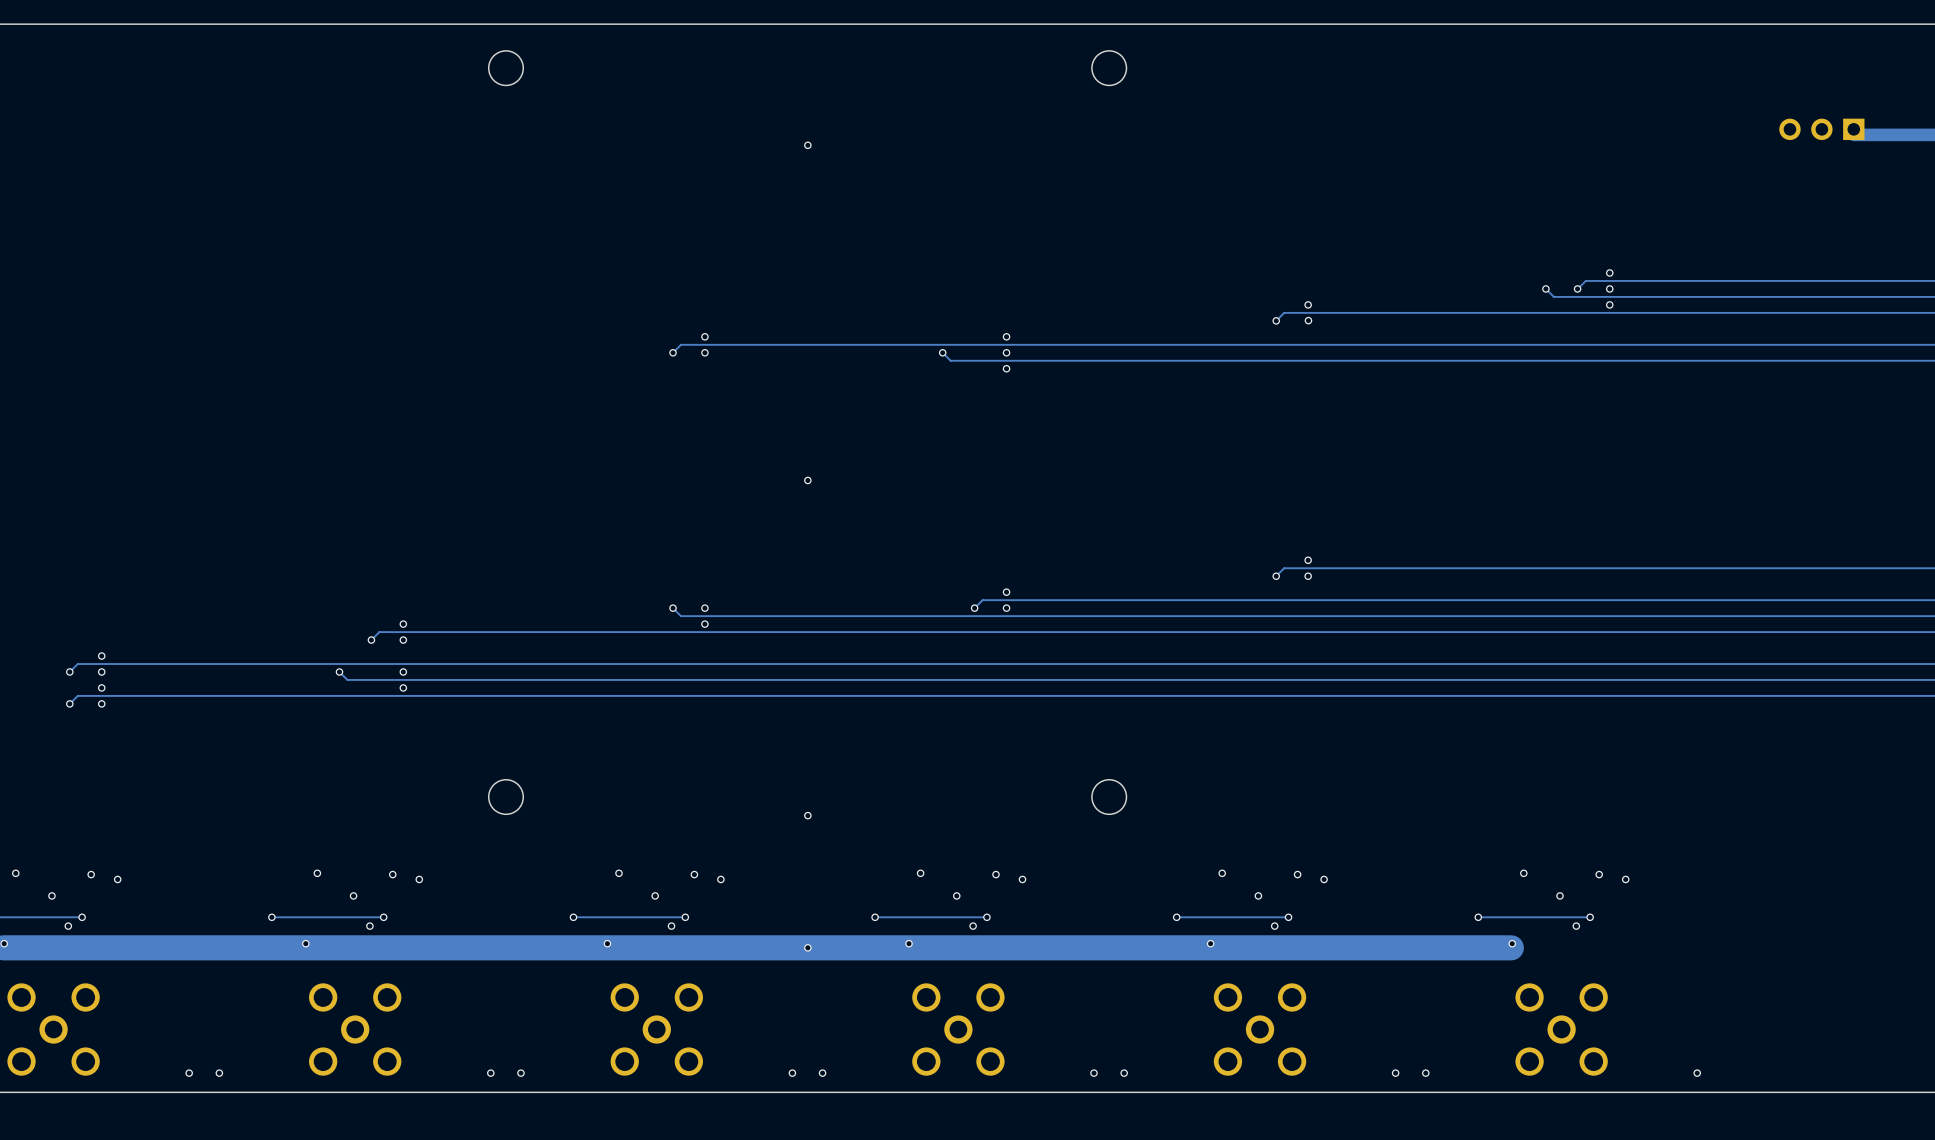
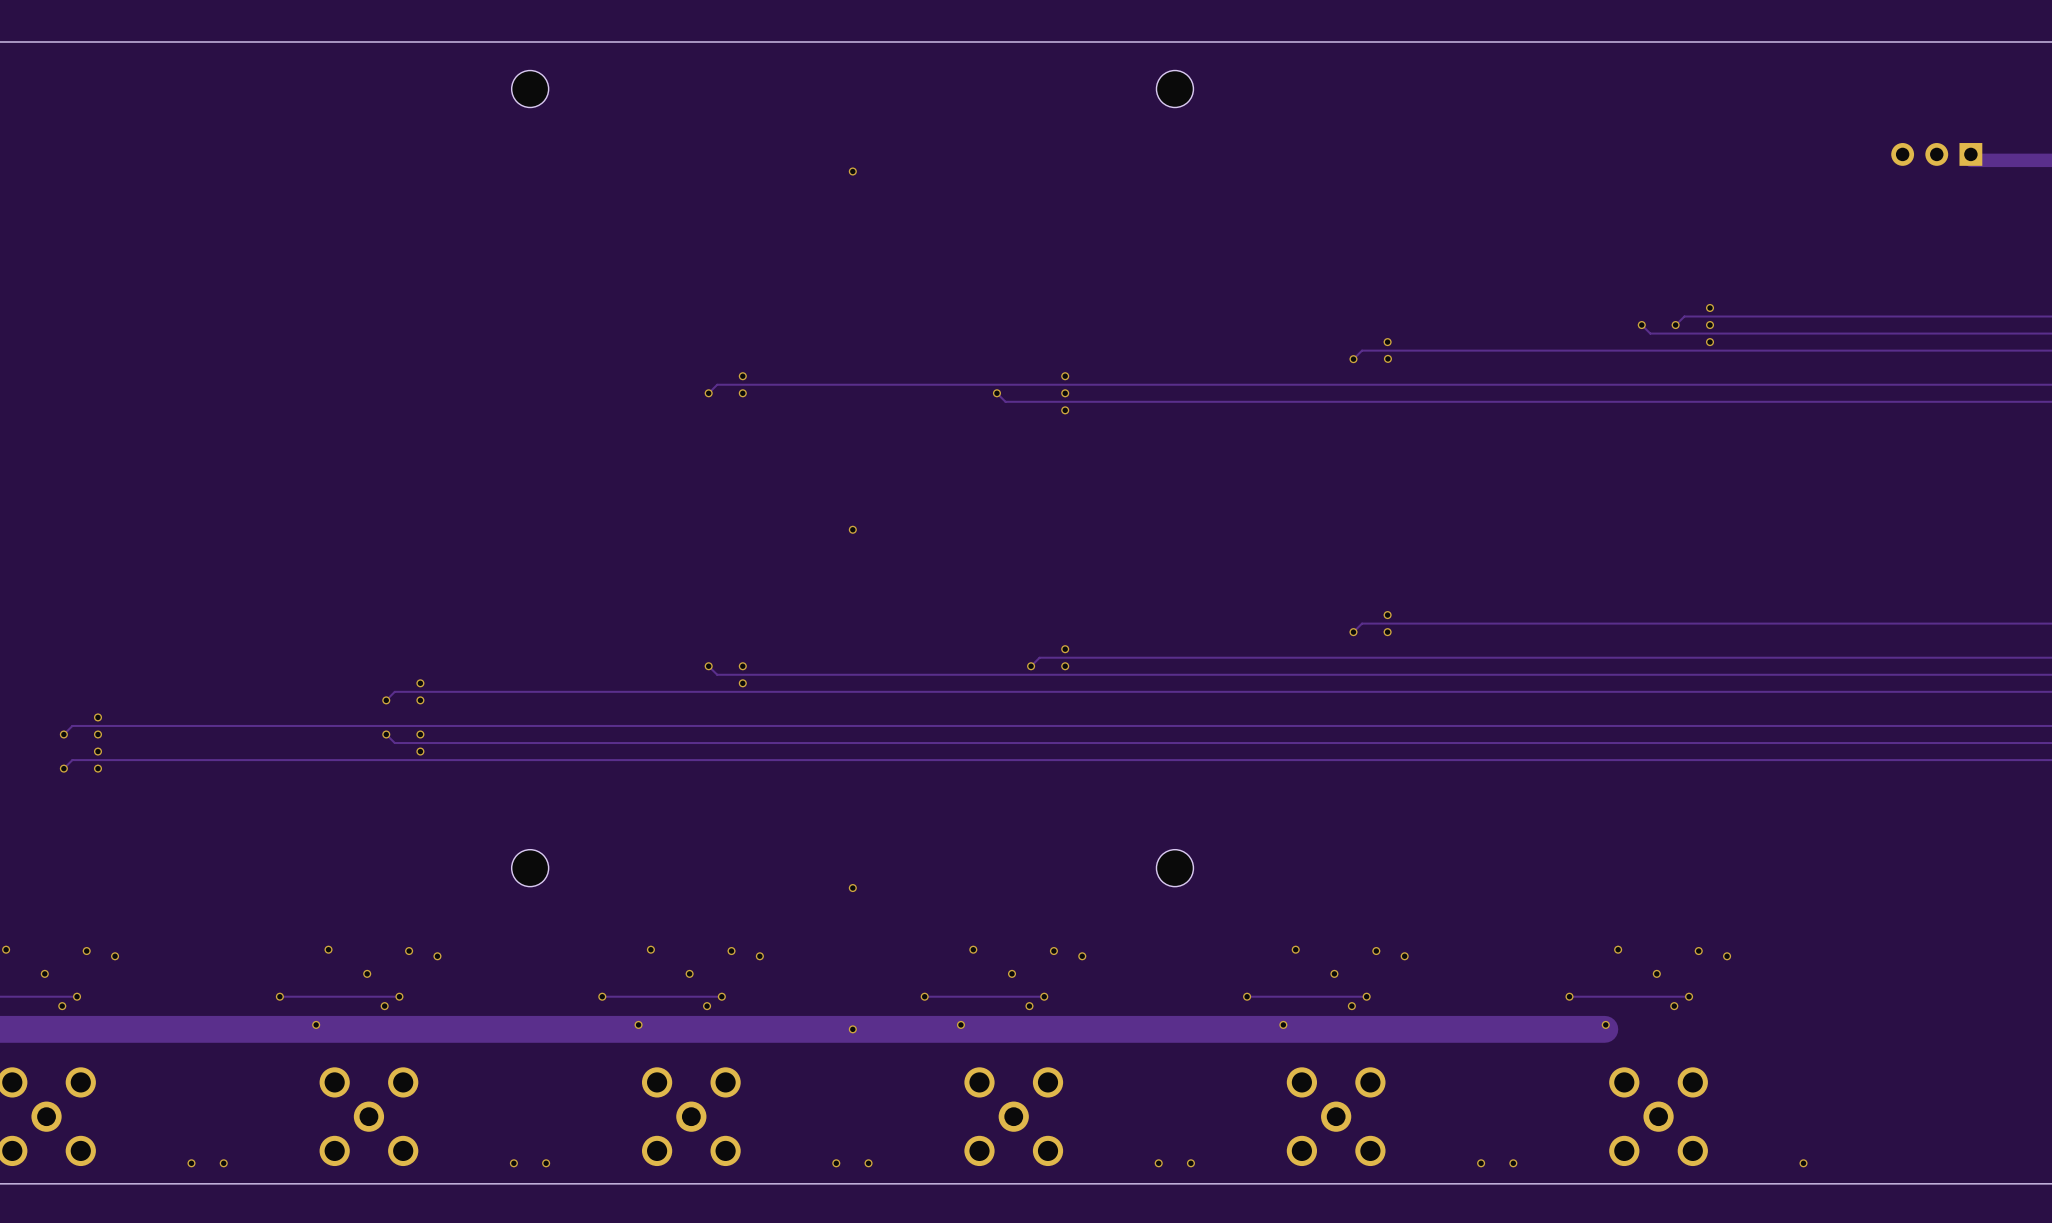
track: (339, 671) (347, 679) (379, 679) -> (386, 734) (394, 743)
via position: (339, 671) -> (386, 734)

